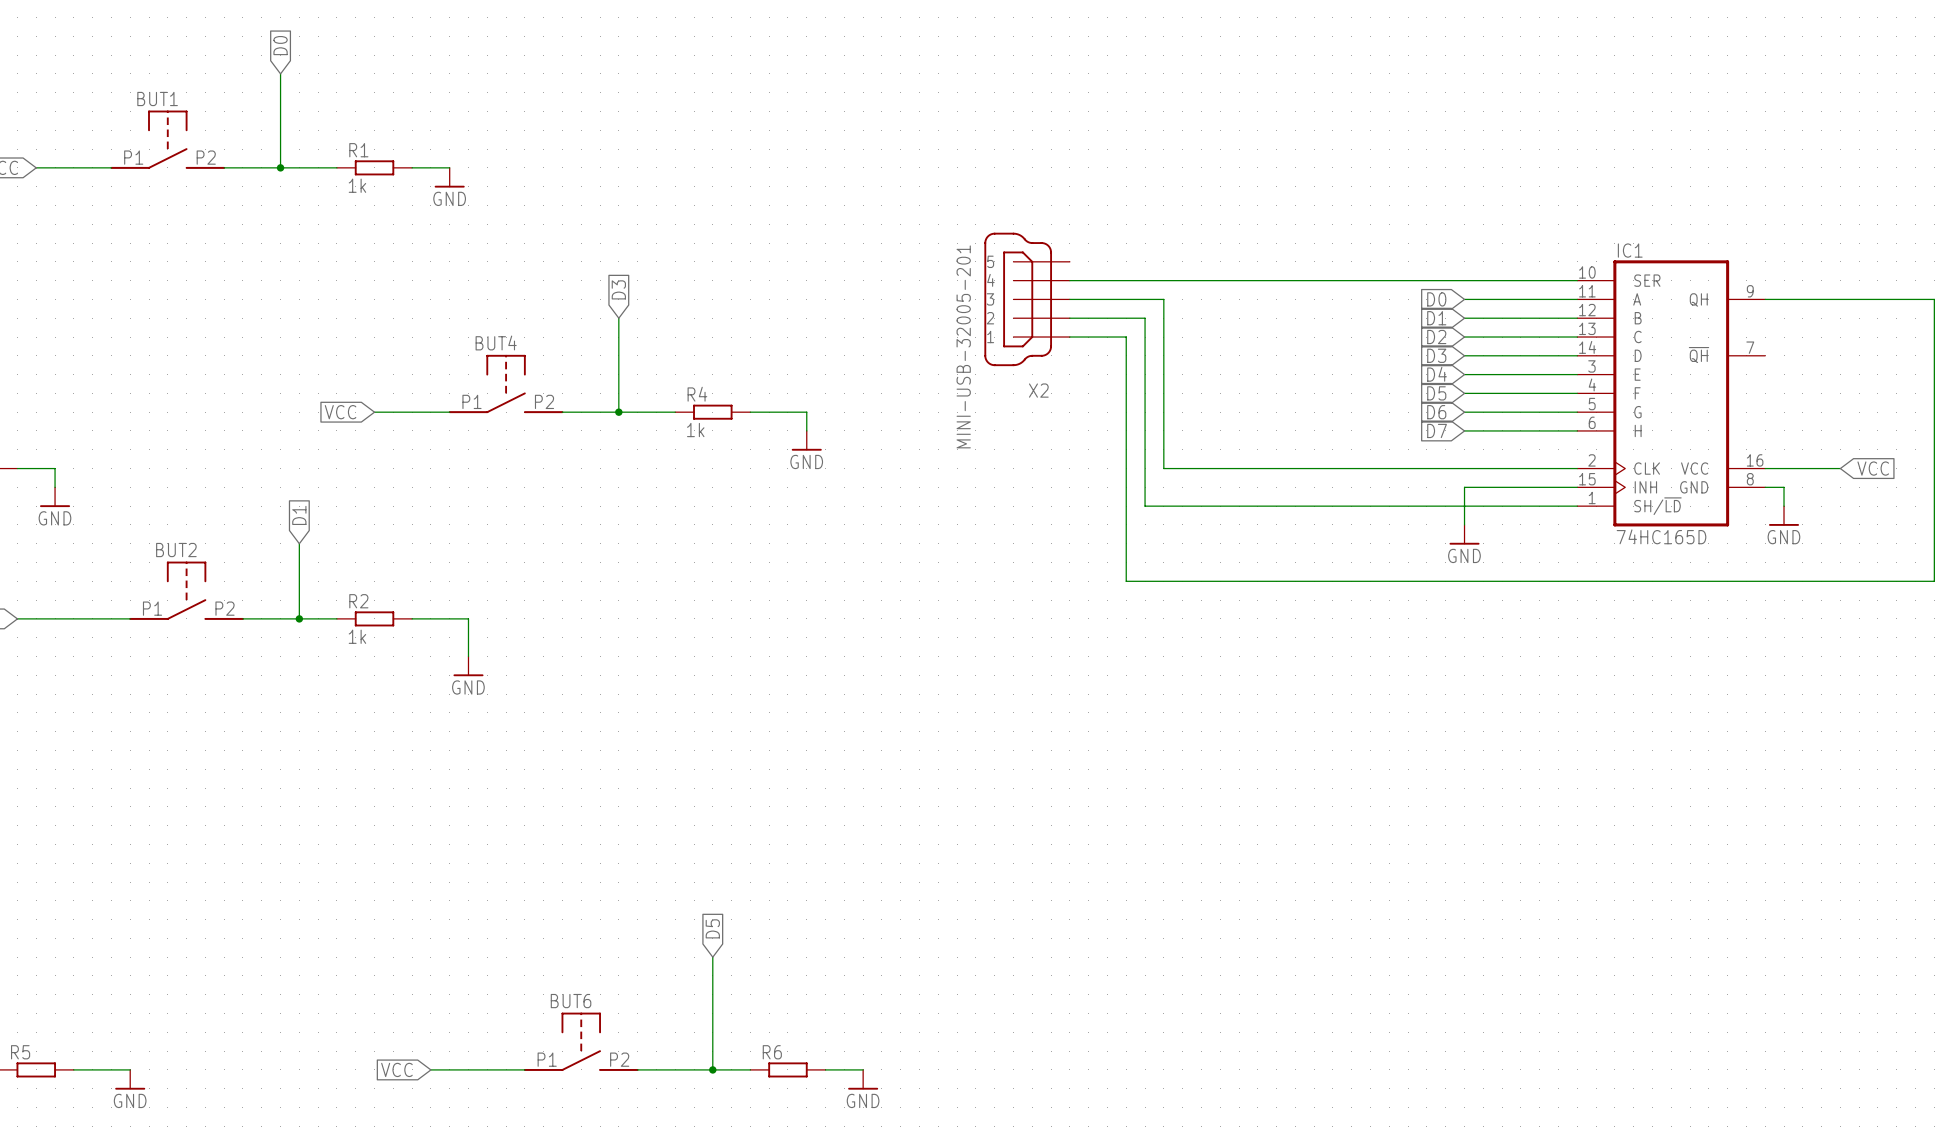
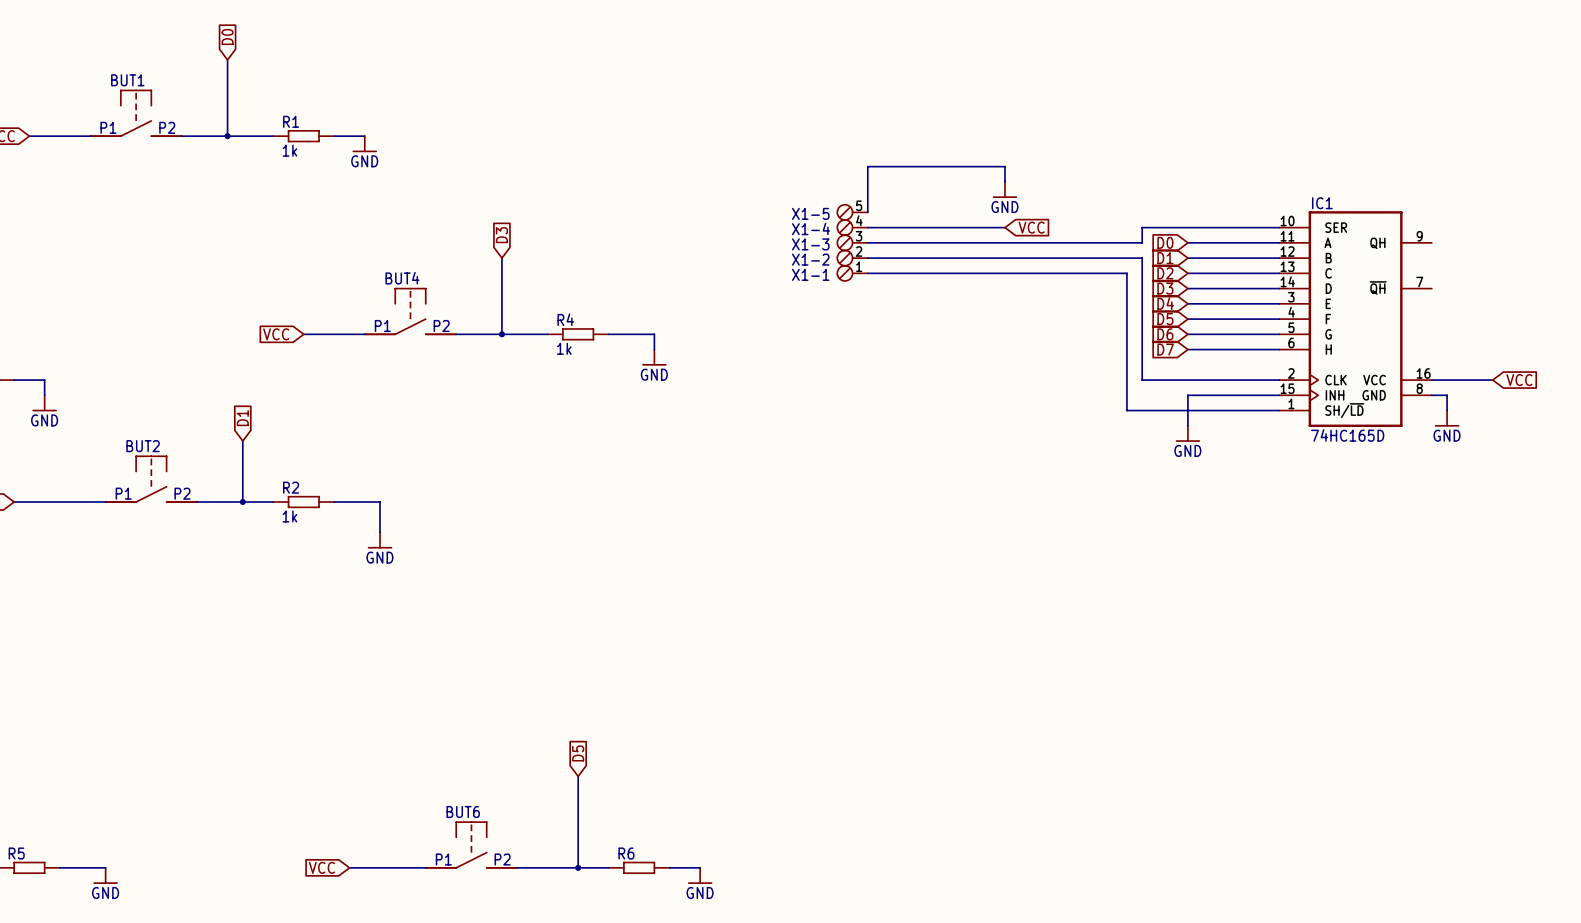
wire: none -> (1004, 181) (1004, 166) (867, 166) (867, 212)
power symbol: none -> GND (1004, 189)
X1-5: none -> (852, 212)
X1-4: none -> (852, 227)
wire: (1239, 280) (1408, 280) -> (944, 242) (1142, 242) (1142, 227)
global label: none -> VCC (1031, 227)
X2: MINI-USB-32005-201 (1027, 299) -> none
X1-3: none -> (852, 242)
wire: (1163, 299) (1163, 468) (1408, 468) -> (928, 258) (1142, 258) (1142, 380)
wire: (1765, 299) (1934, 299) (1934, 581) (1126, 581) (1126, 337) -> none
X1-2: none -> (852, 258)
wire: (1145, 318) (1145, 506) (1389, 506) -> (913, 273) (1126, 273) (1126, 410)
X1-1: none -> (852, 273)

